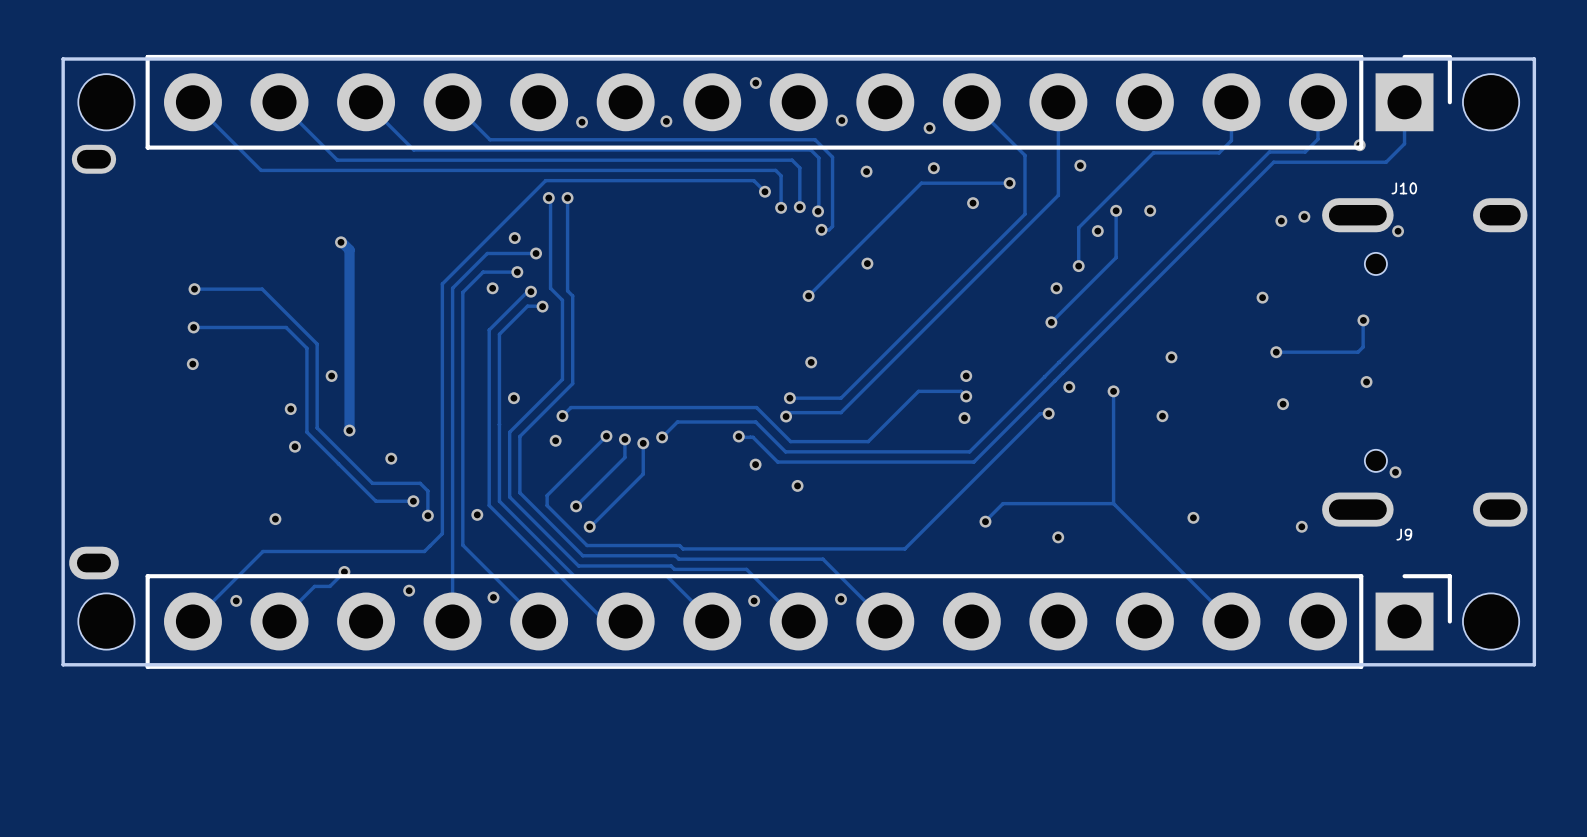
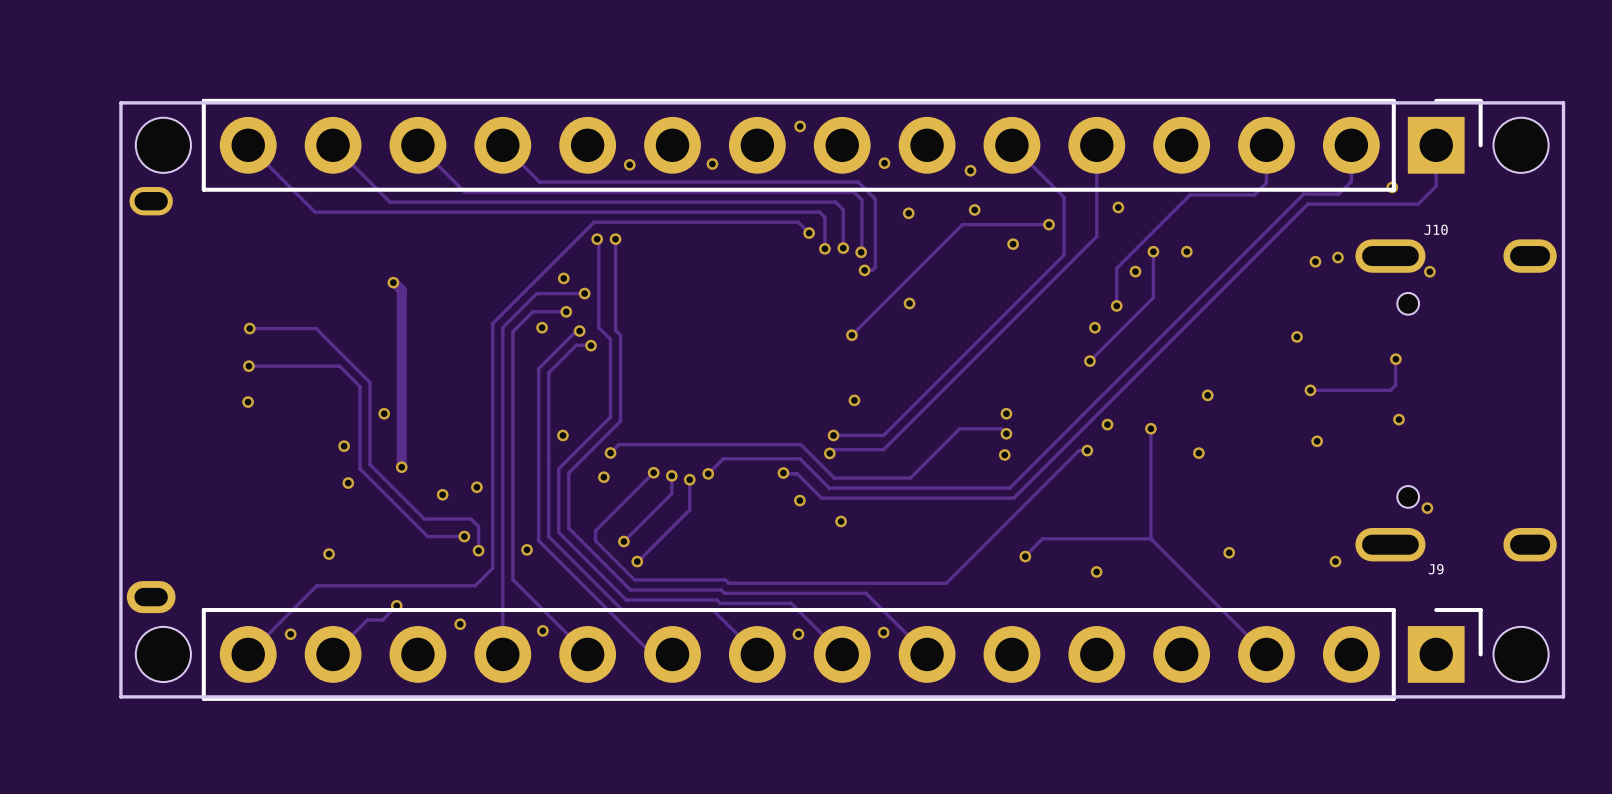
via: none -> (476, 487)

